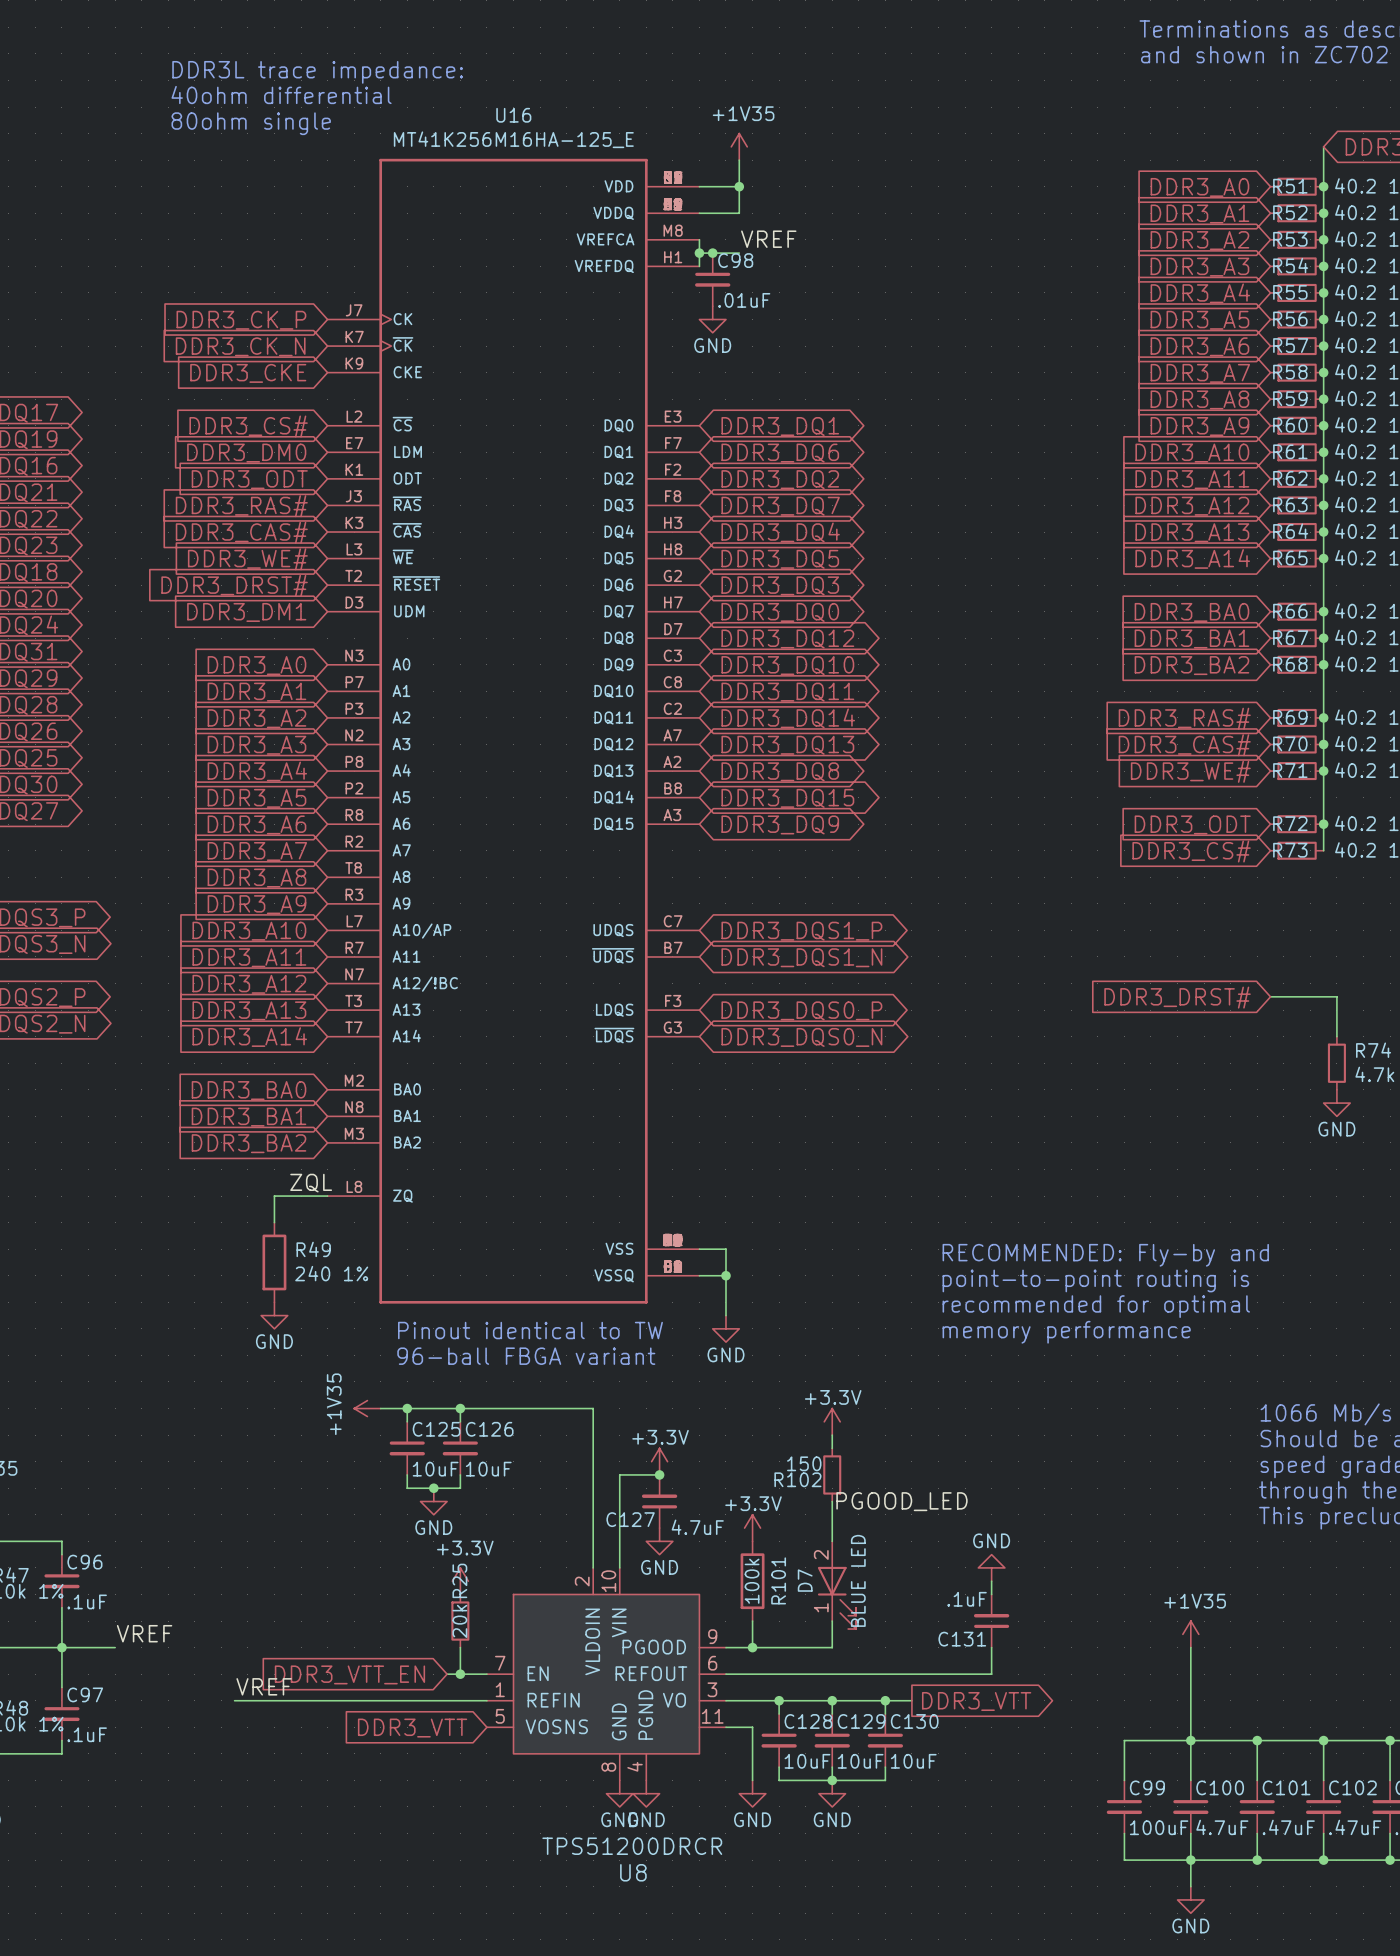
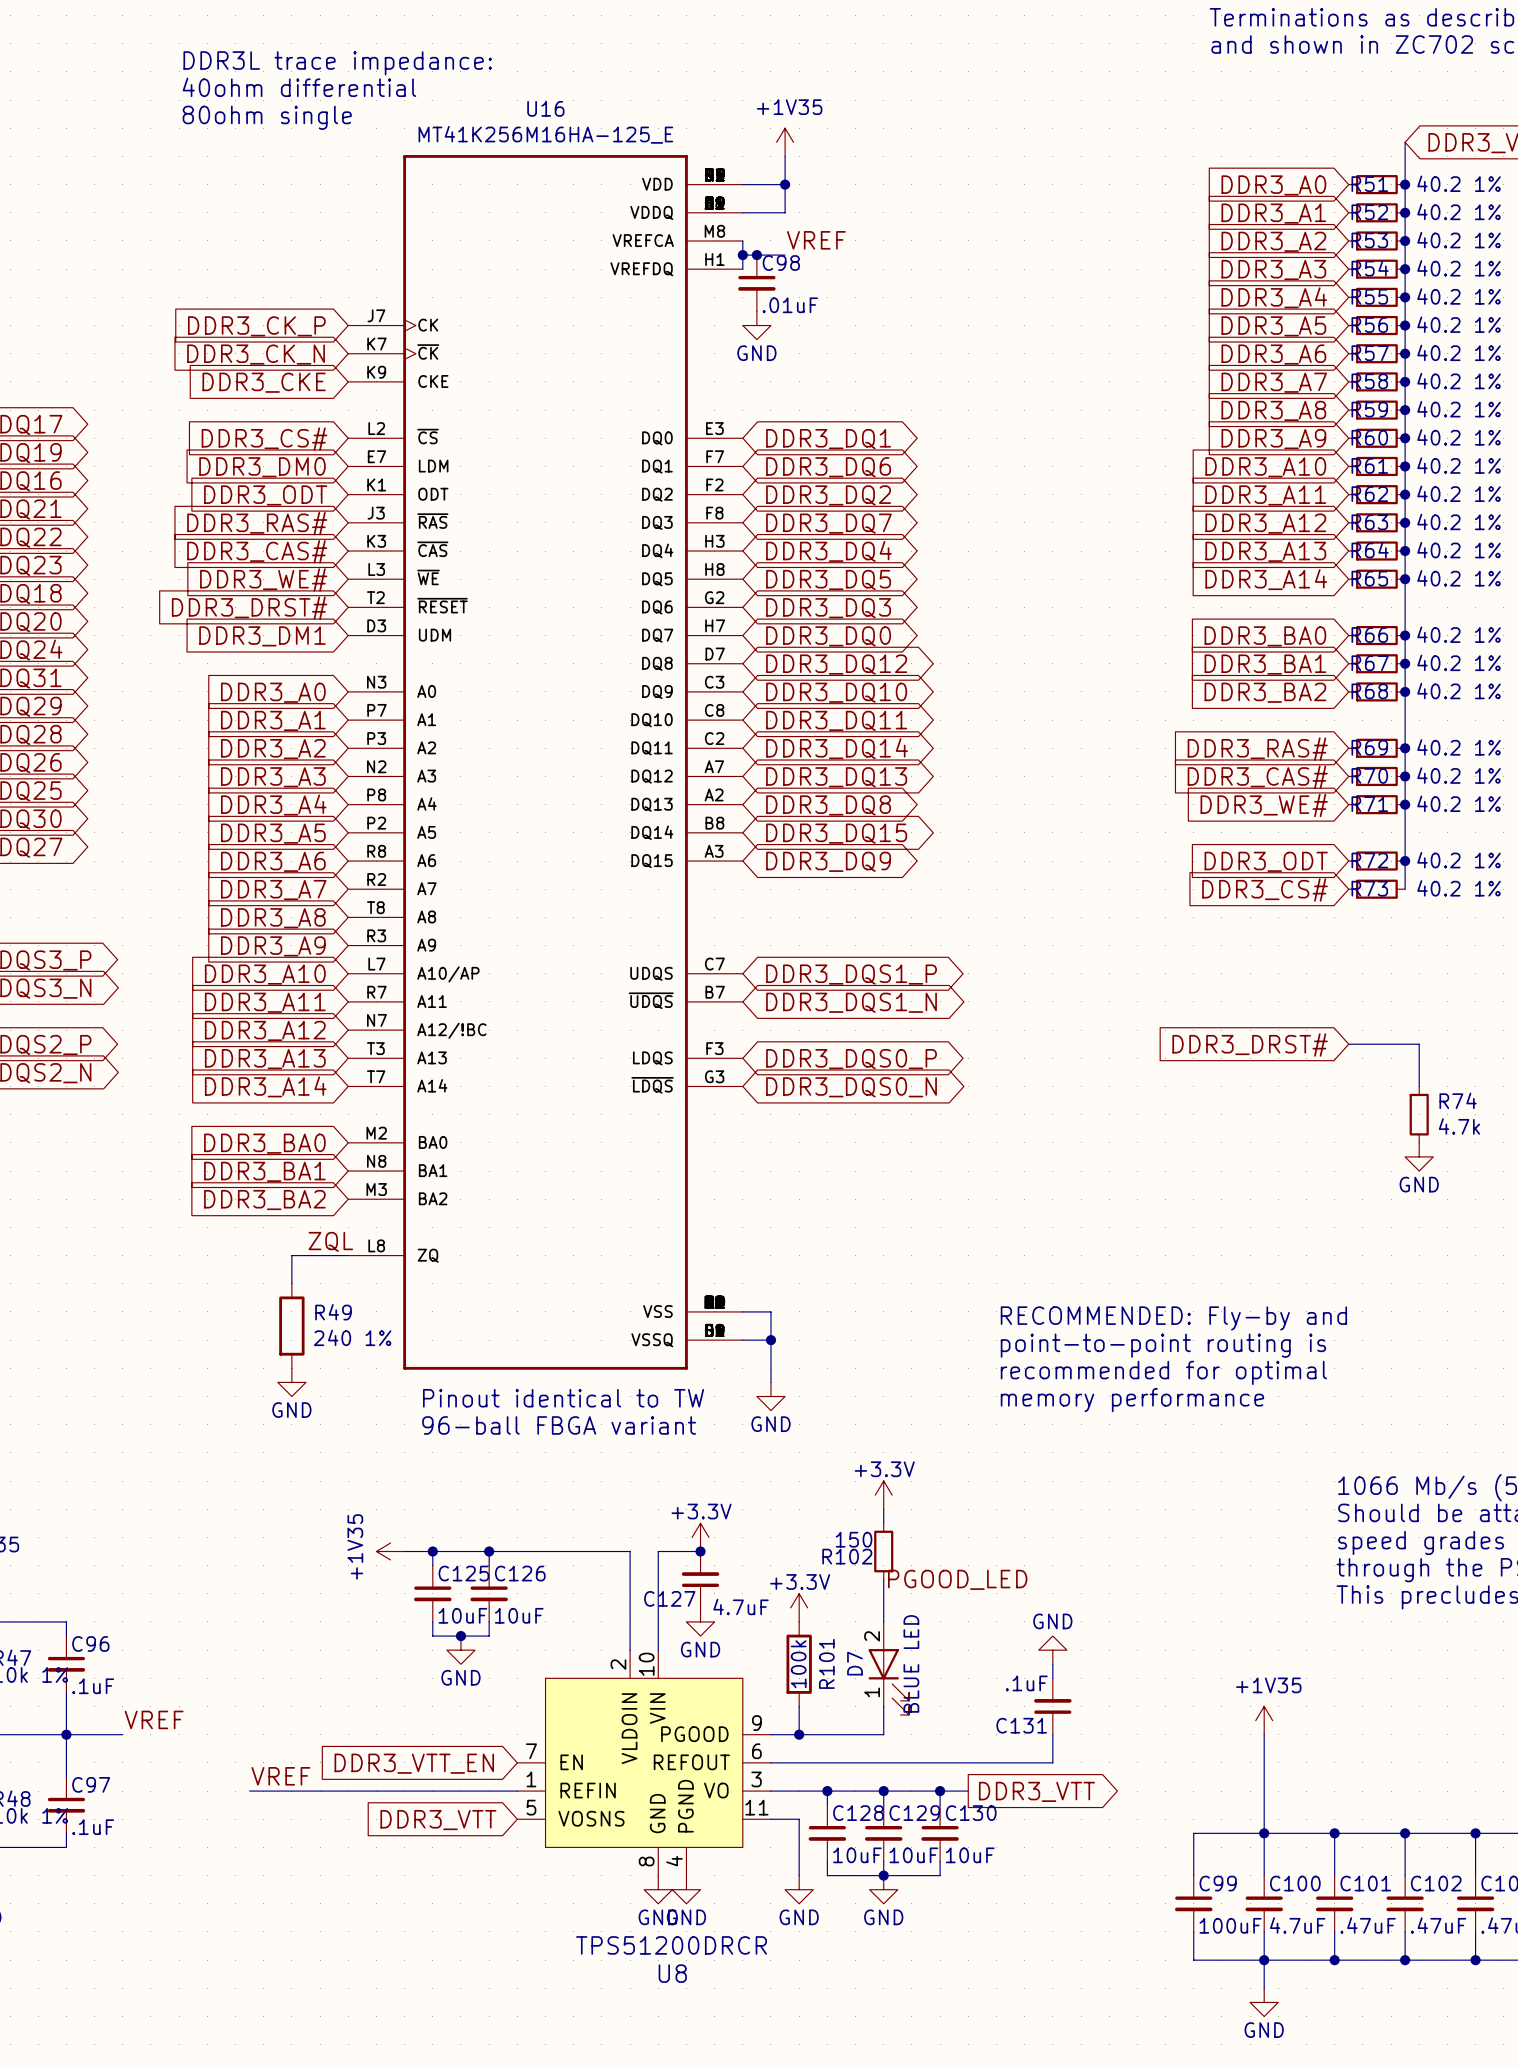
power symbol position: +1V35 (367, 1408) -> +1V35 (390, 1551)
wire: (380, 1408) (593, 1408) (593, 1474) -> (404, 1551) (630, 1551)
wire: (407, 1408) (407, 1421) -> none
junction: (407, 1408) -> none
wire: (460, 1408) (460, 1421) -> none
junction: (460, 1408) -> none
C125 position: (407, 1448) -> (432, 1593)
C126 position: (460, 1448) -> (489, 1593)
junction: none -> (432, 1551)
junction: none -> (489, 1551)
wire: (407, 1488) (460, 1488) -> none
junction: (433, 1488) -> none
power symbol position: GND (433, 1501) -> GND (460, 1650)
wire: none -> (432, 1621) (432, 1636) (489, 1636) (489, 1621)
junction: none -> (460, 1636)
power symbol: +3.3V (460, 1581) -> none
R25: 20k (460, 1621) -> none
wire: (460, 1647) (460, 1674) -> none
global label position: DDR3_VTT_EN (349, 1674) -> DDR3_VTT_EN (414, 1763)
wire: (447, 1674) (486, 1674) -> none
junction: (460, 1674) -> none

